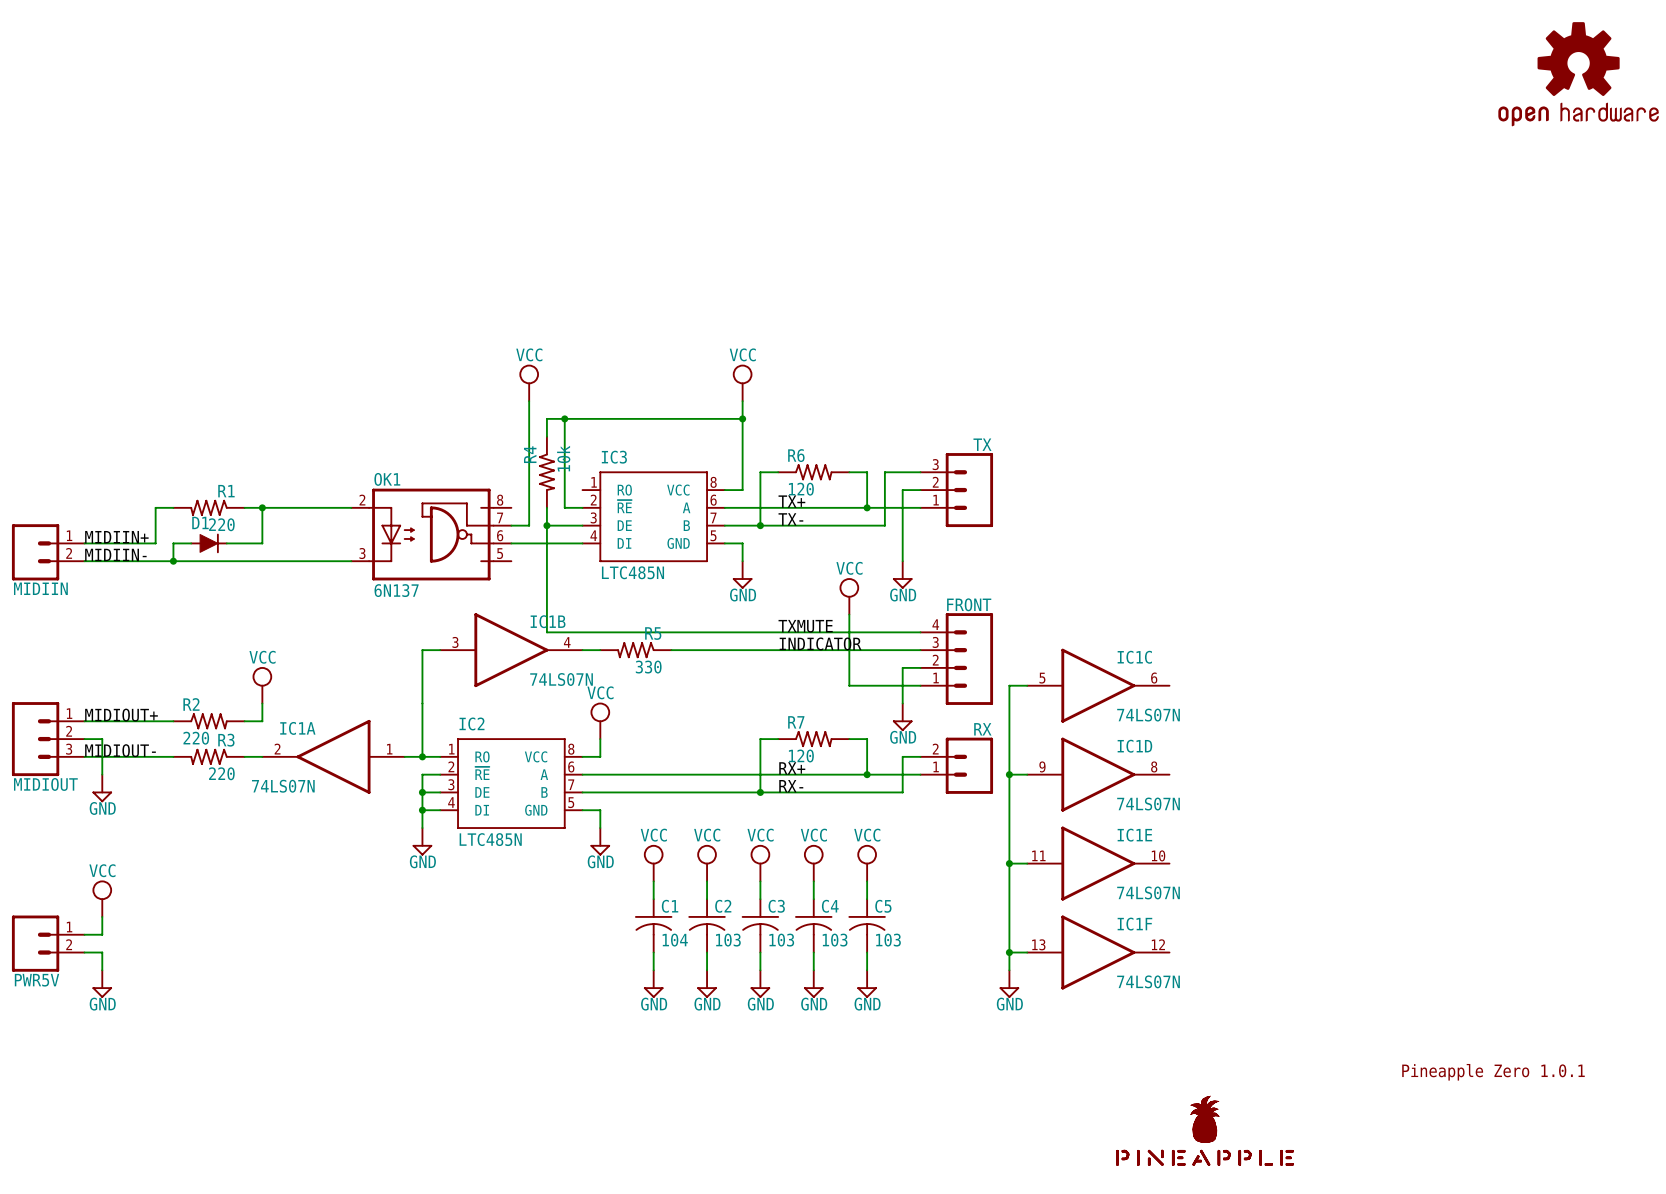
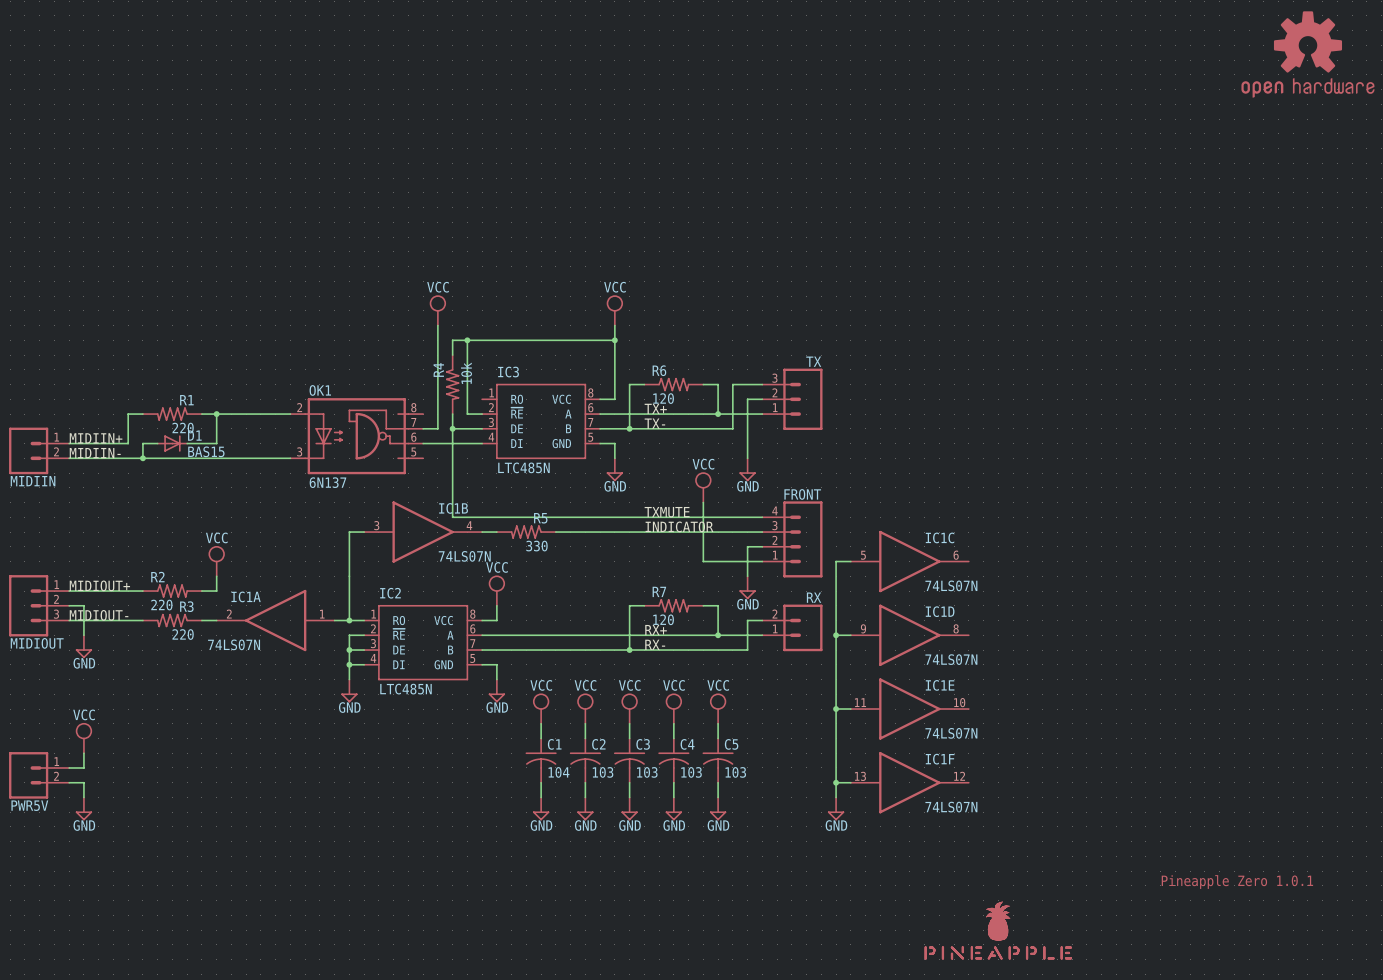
D1 name position: D1 (200, 522) -> D1 (194, 435)
D1 symbol: [190, 534, 228, 553] -> [157, 435, 188, 452]
D1 value: none -> BAS15 (206, 451)

